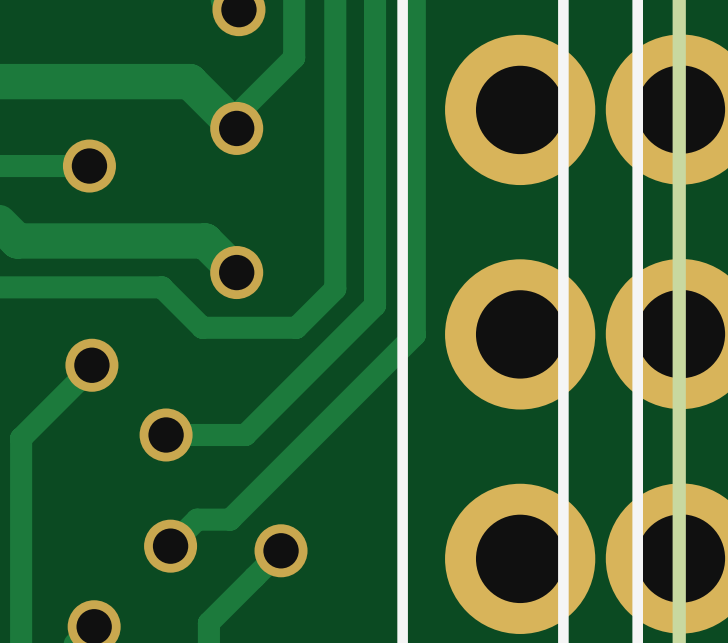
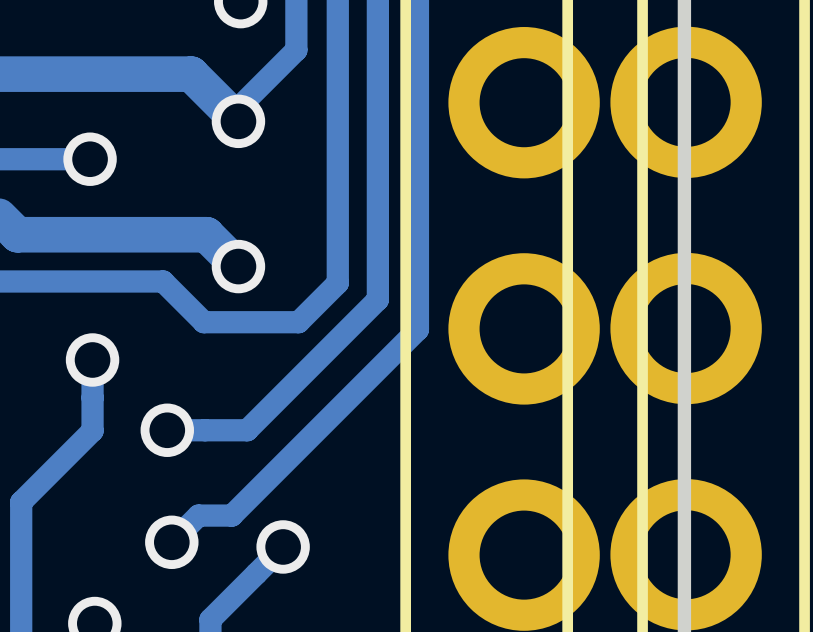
track: (91, 367) (21, 438) (21, 506) -> (92, 362) (92, 430) (21, 502)

